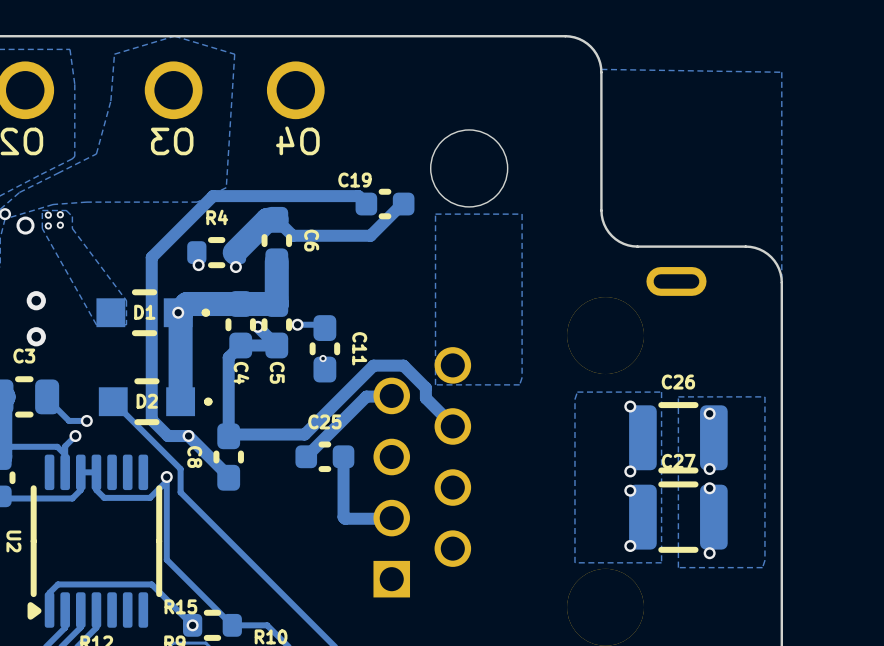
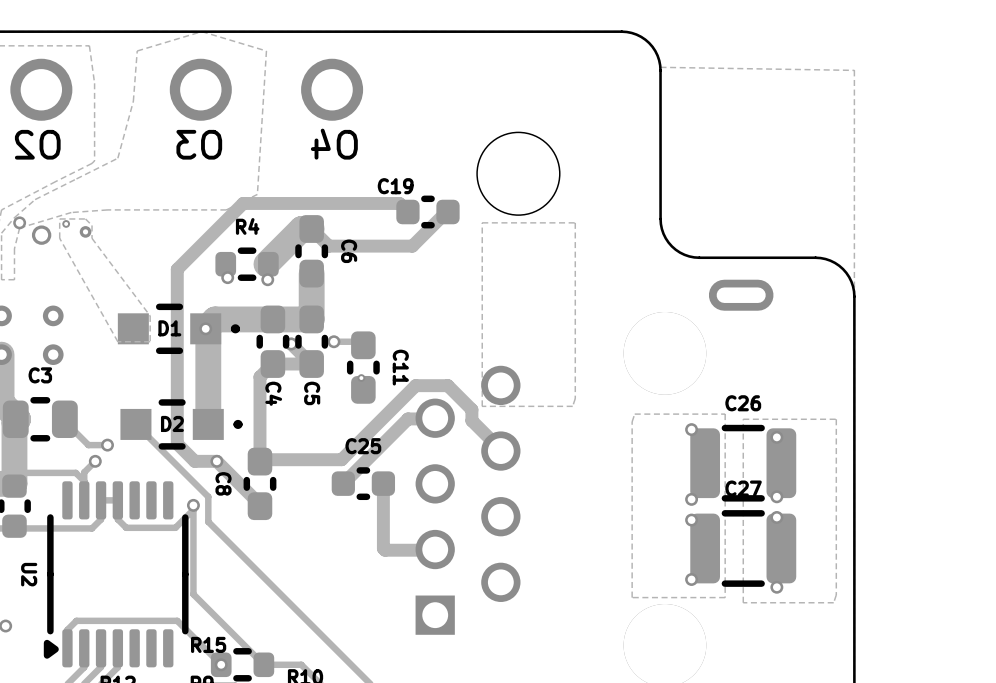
via: (60, 214) -> none
via: none -> (85, 231)
via: (48, 225) -> none
via: (60, 225) -> none

